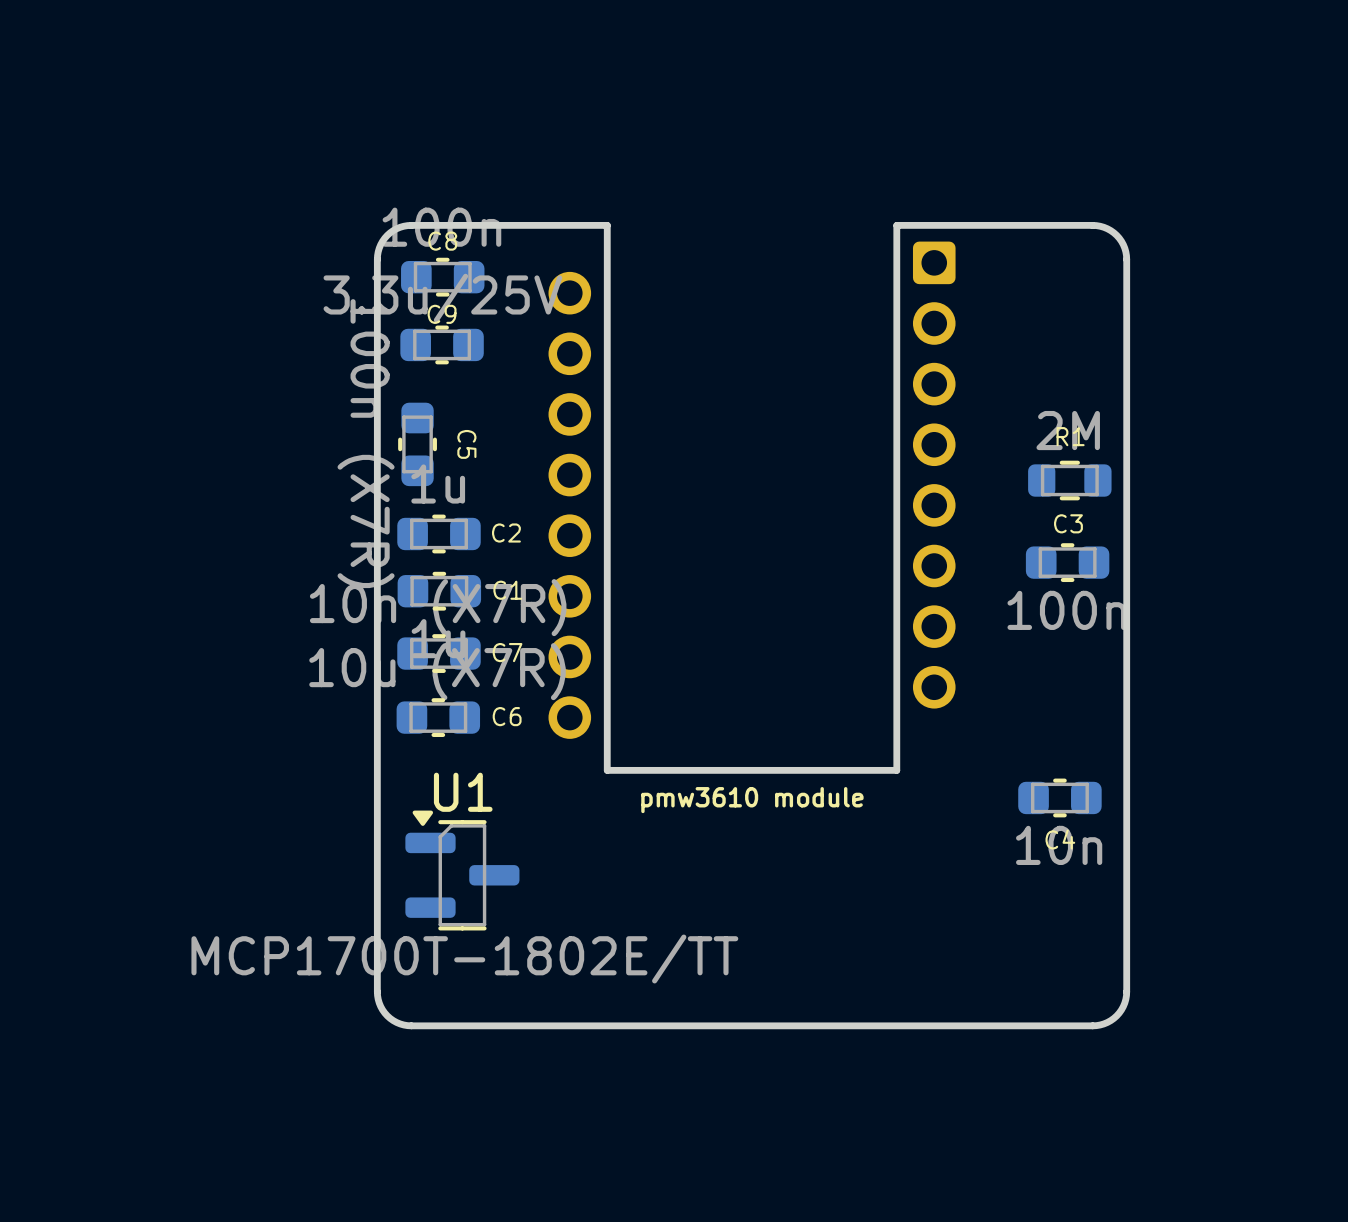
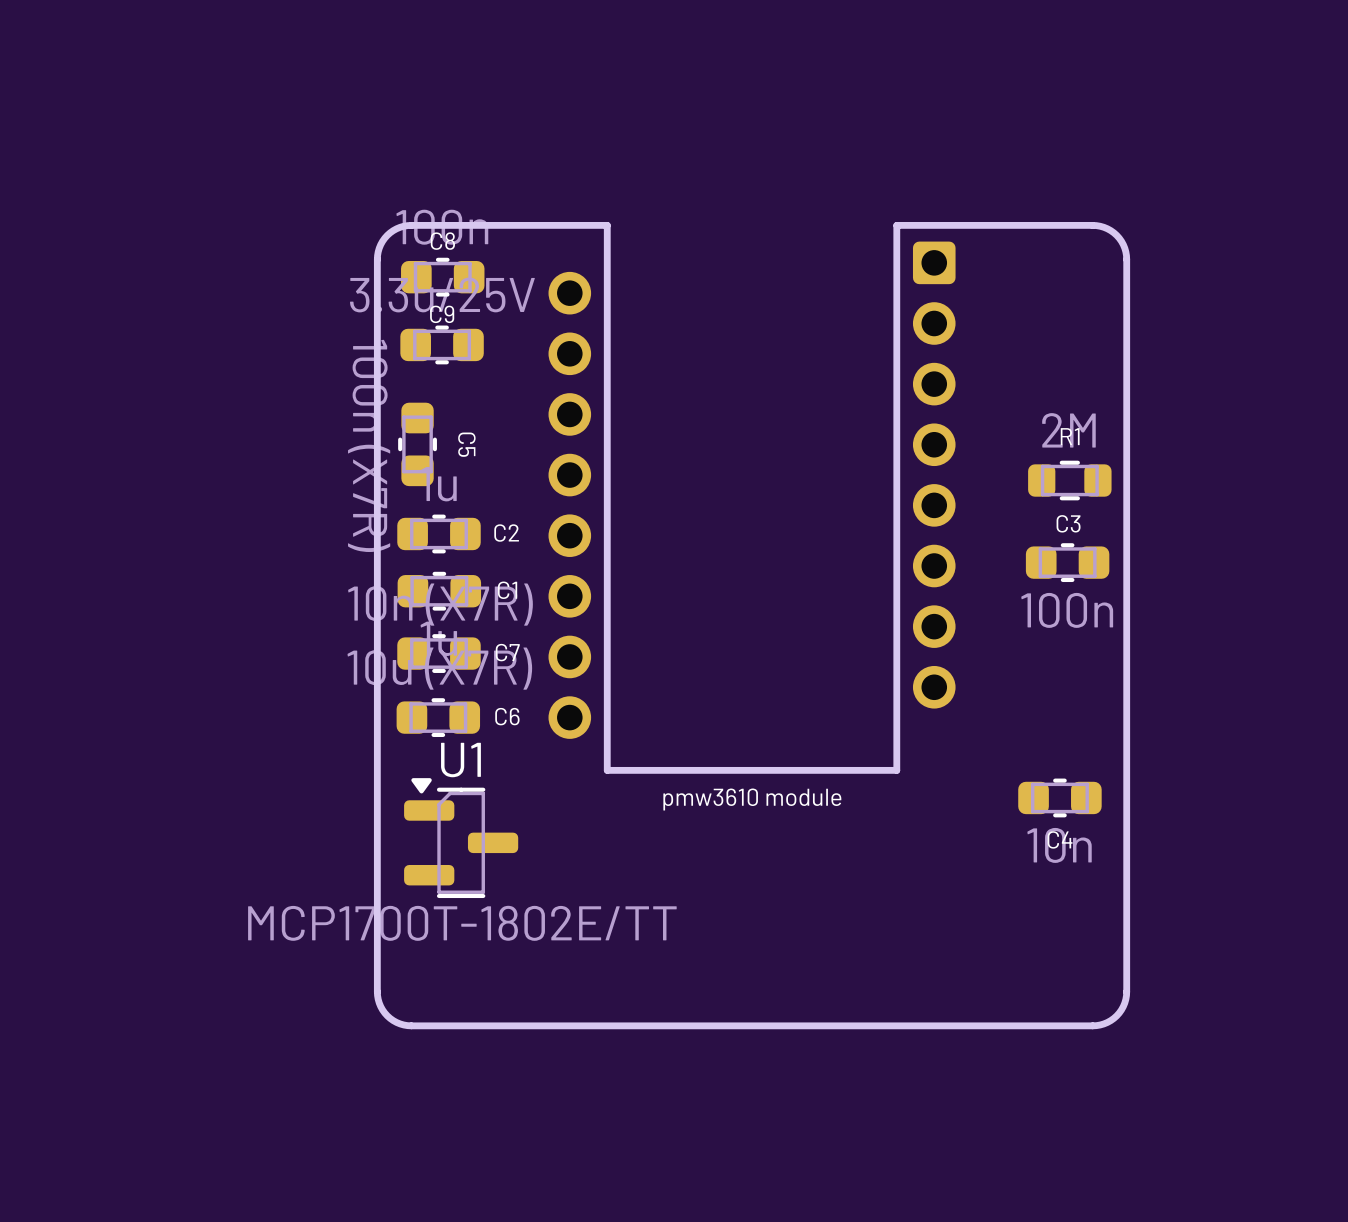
U1 position: (462, 870) -> (461, 838)

